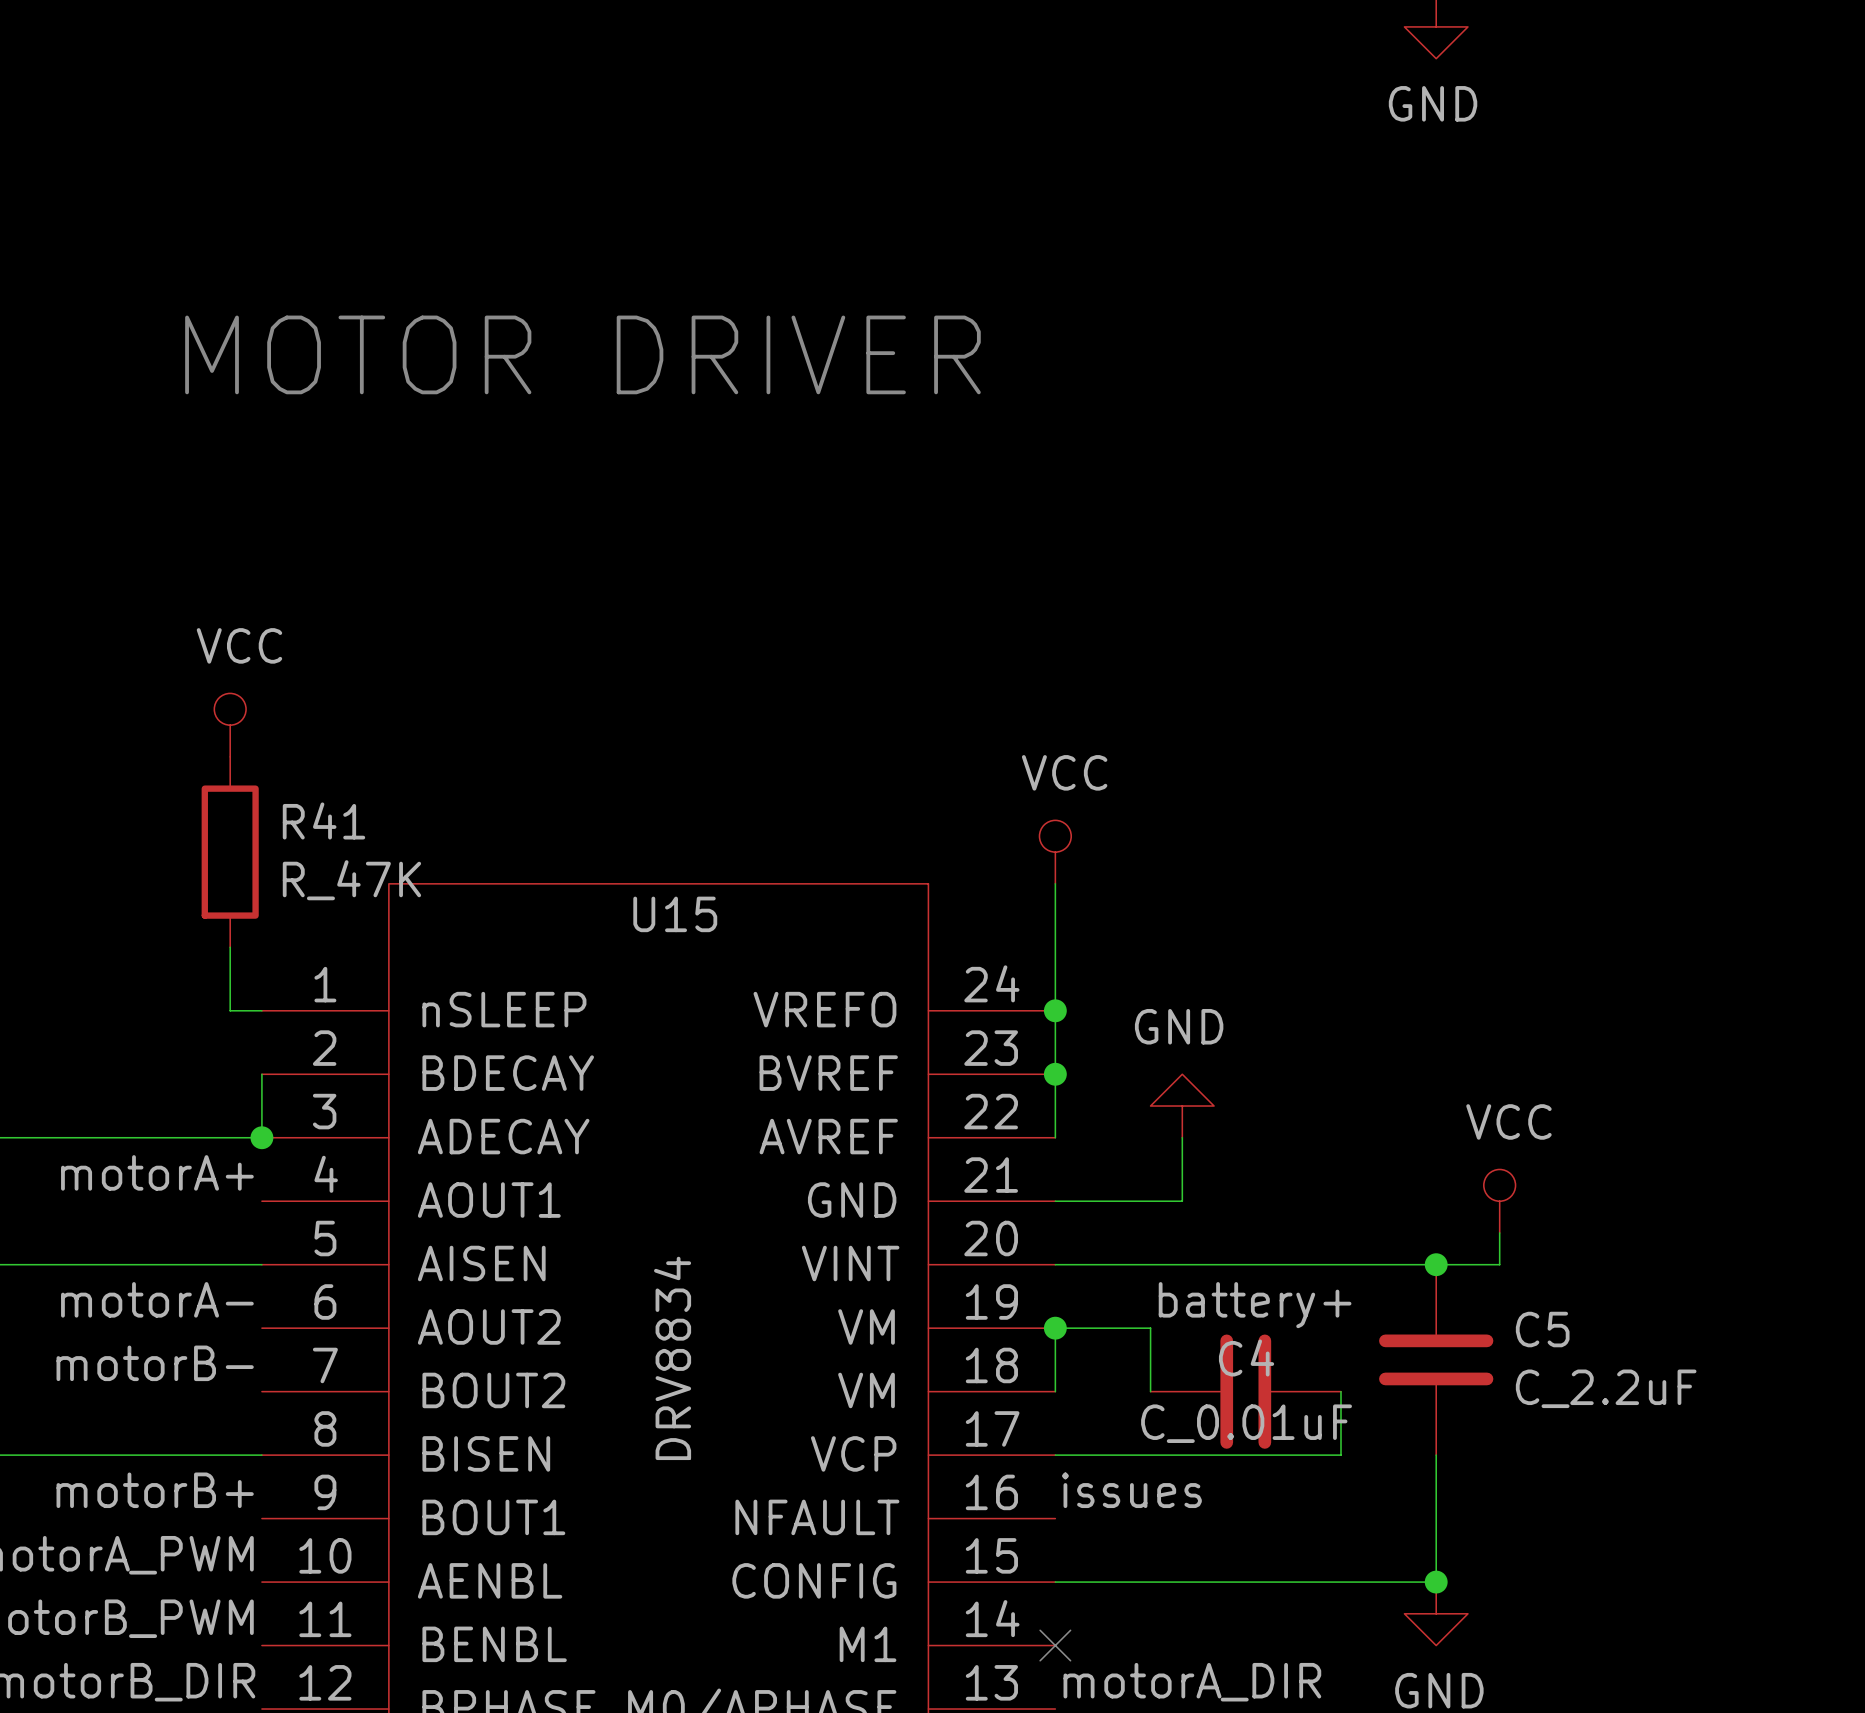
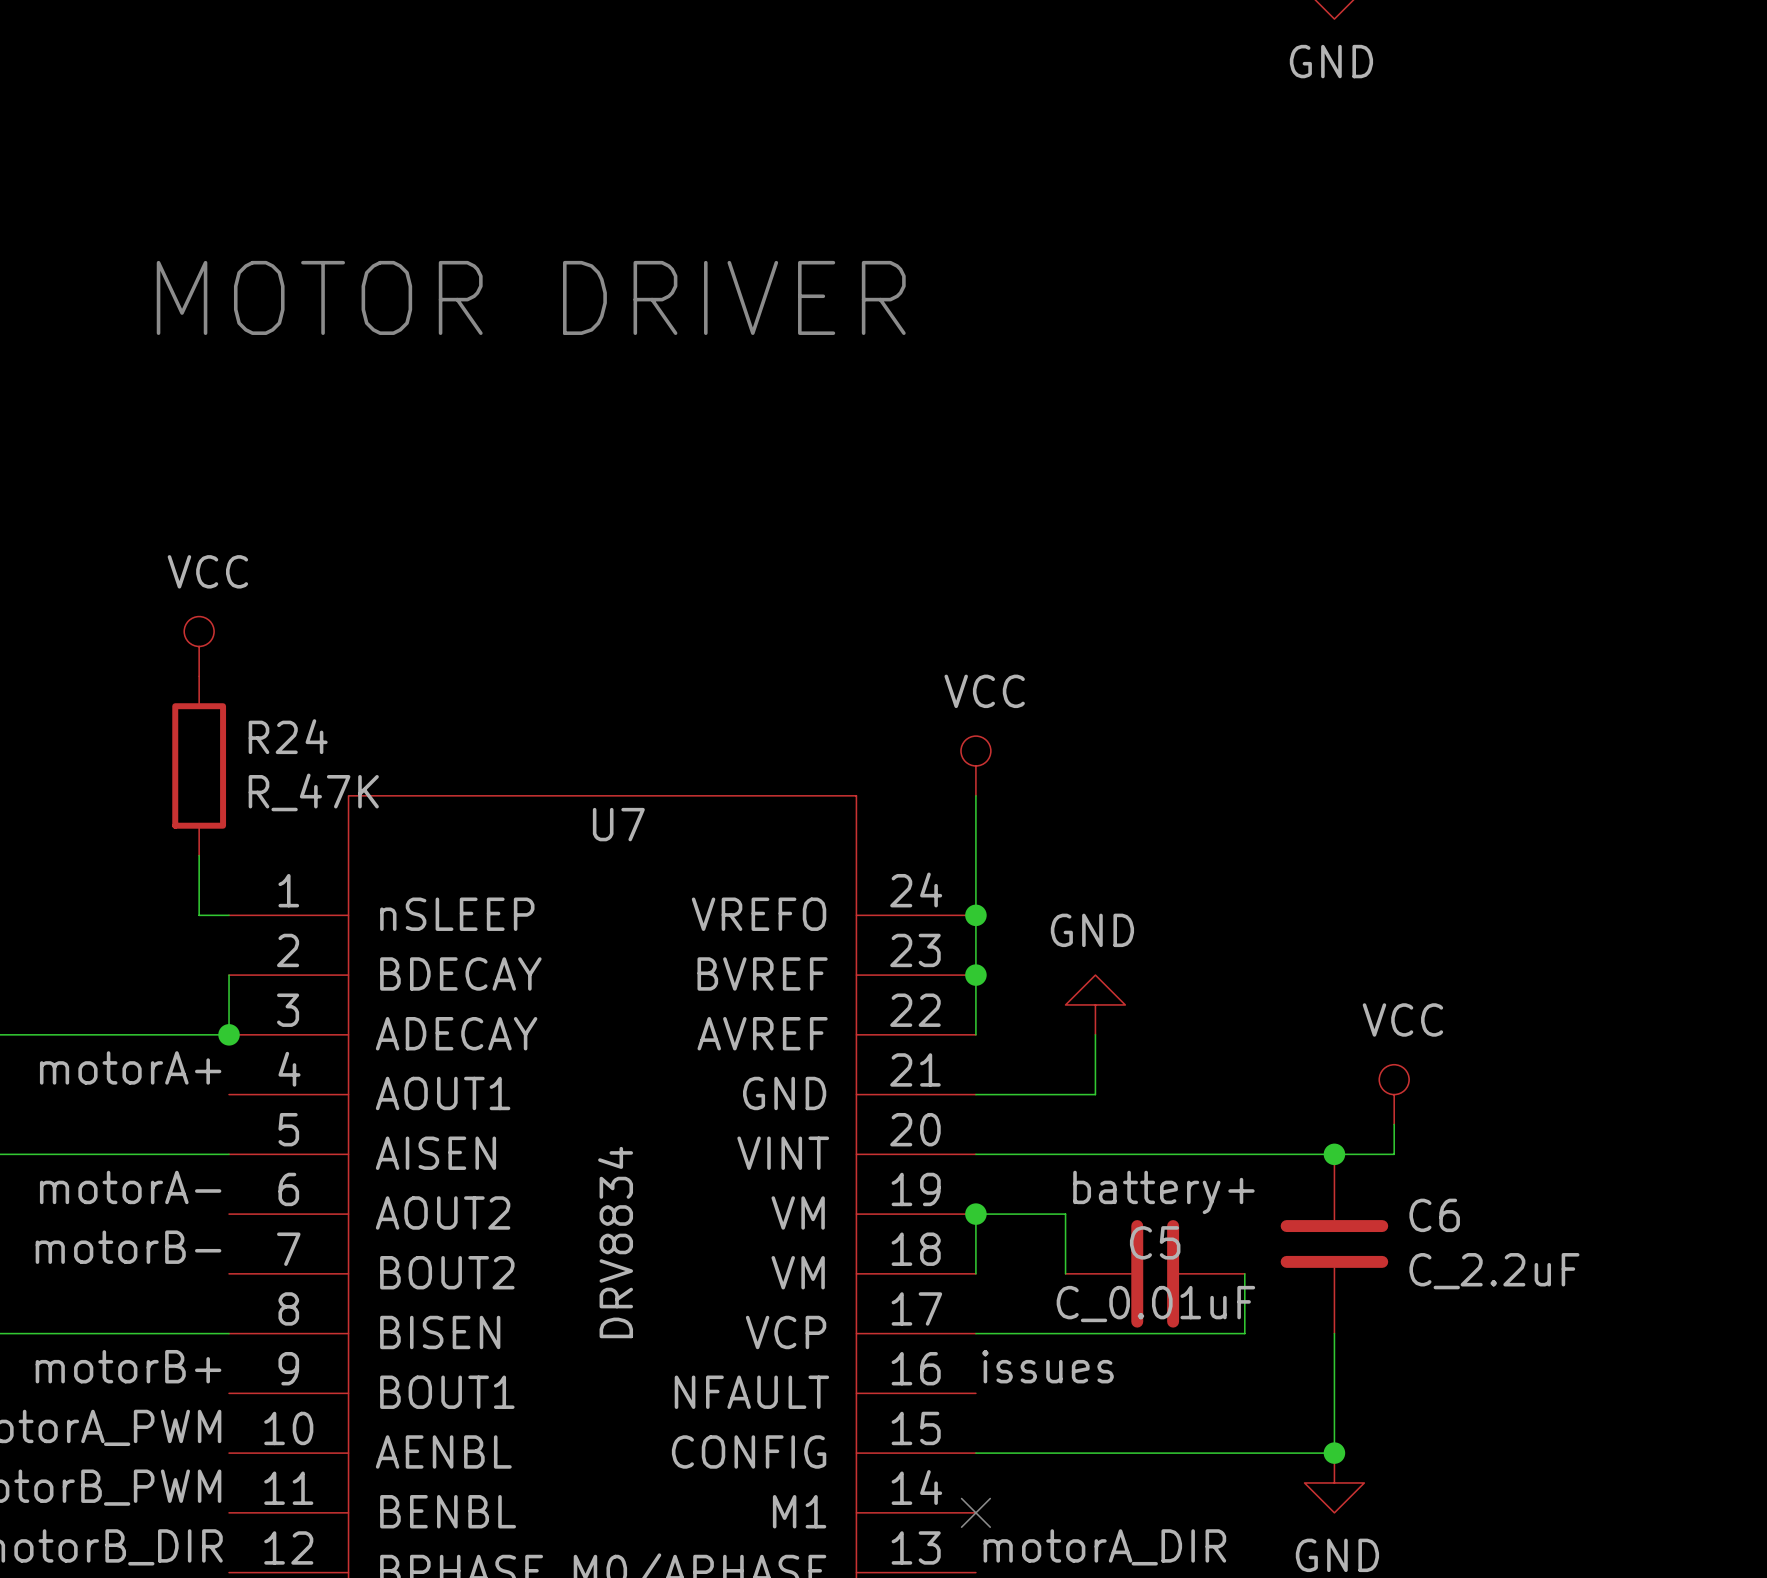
R41 name: R41 (323, 820) -> R24 (288, 736)
U15 name: U15 (675, 914) -> U7 (618, 824)
C5 name: C5 (1542, 1329) -> C6 (1434, 1215)
C4 name: C4 (1246, 1357) -> C5 (1155, 1242)

